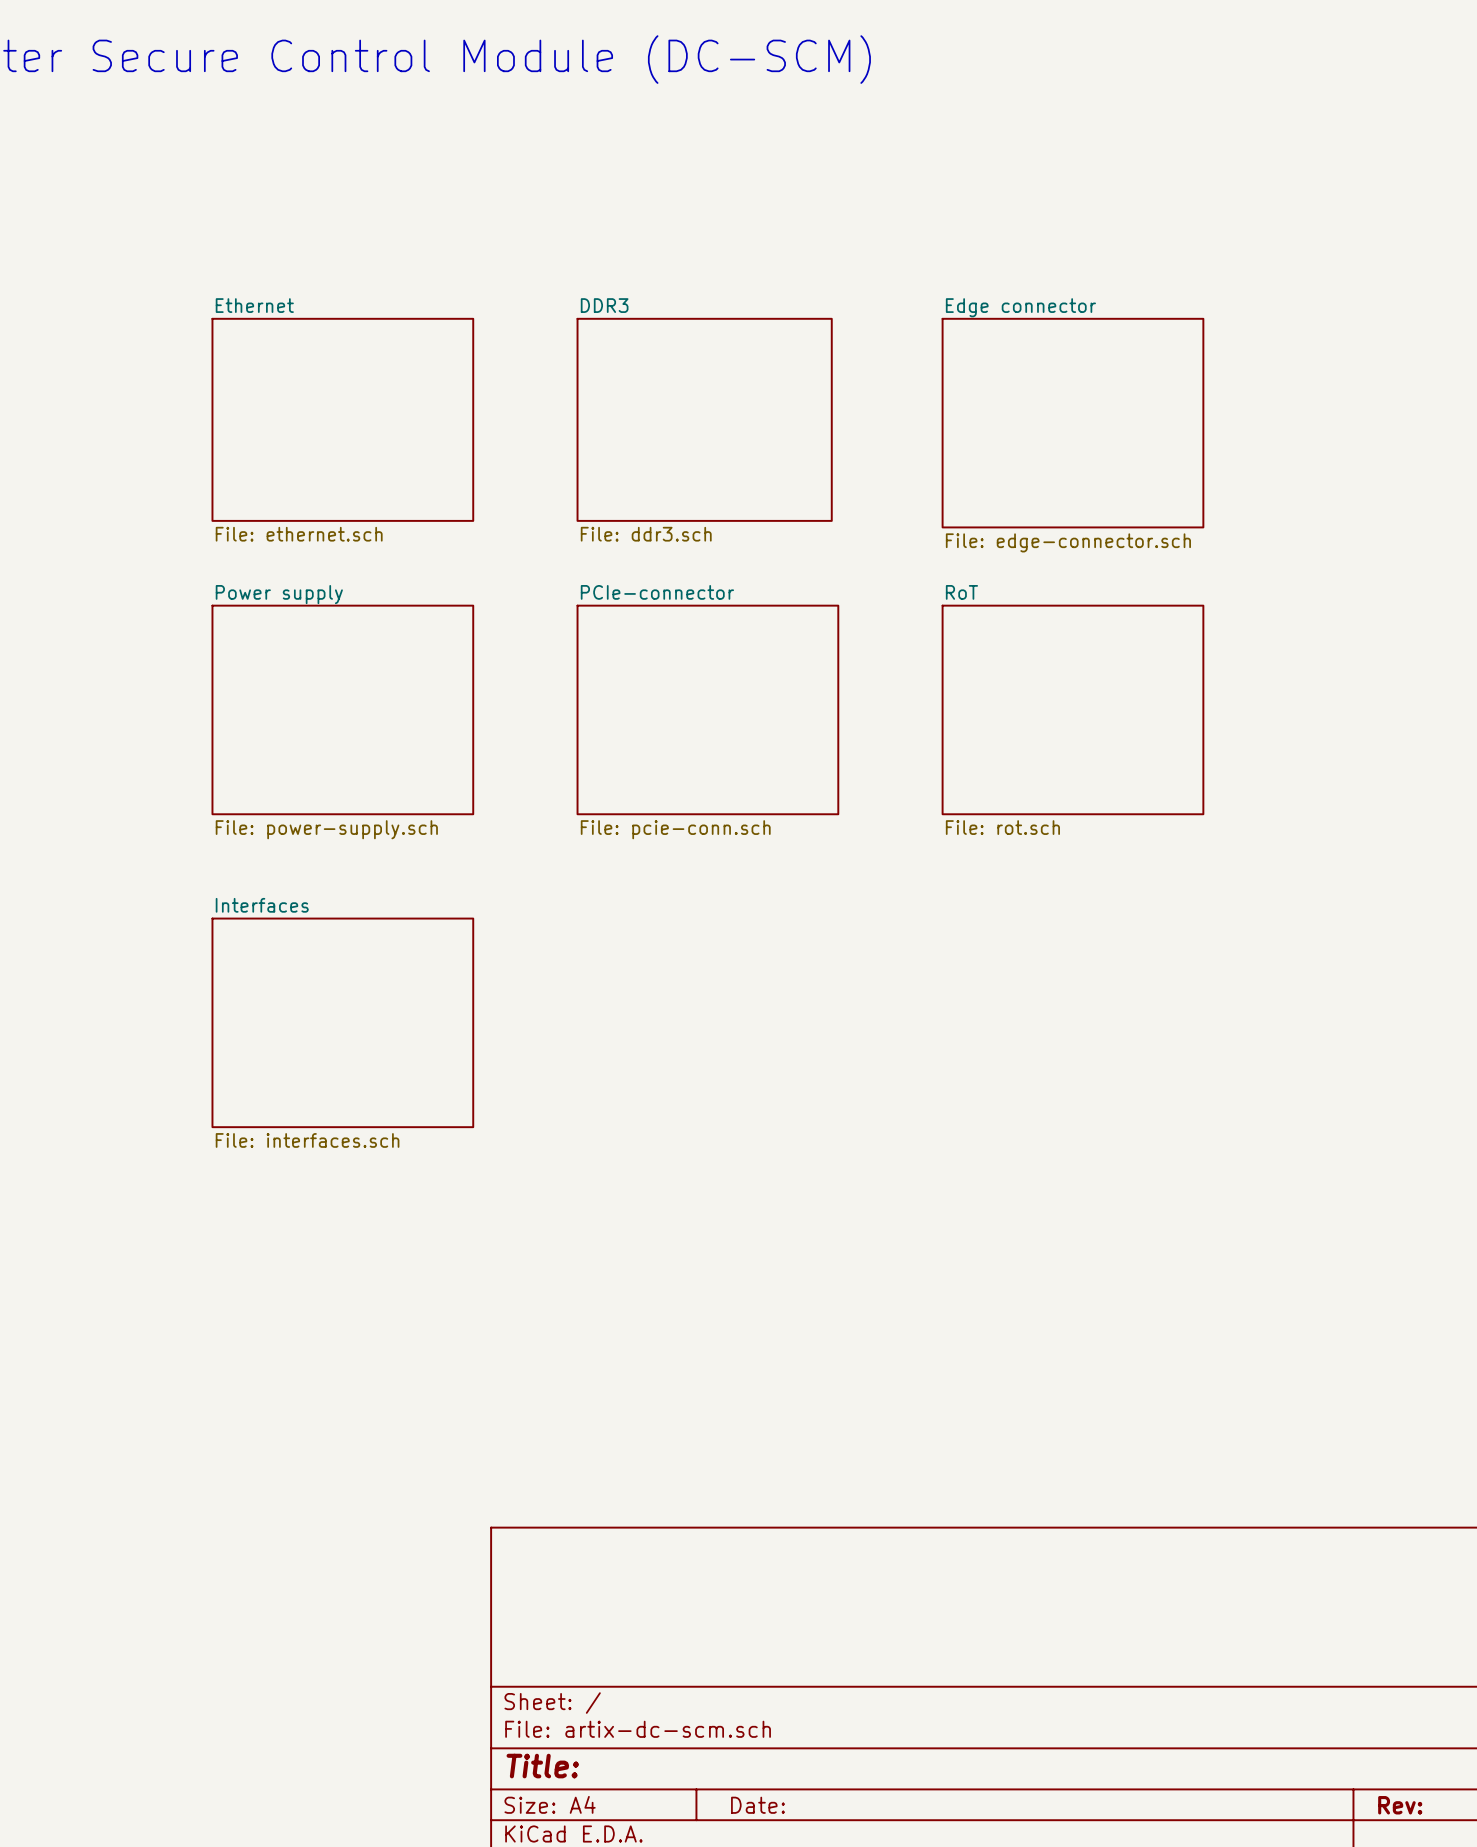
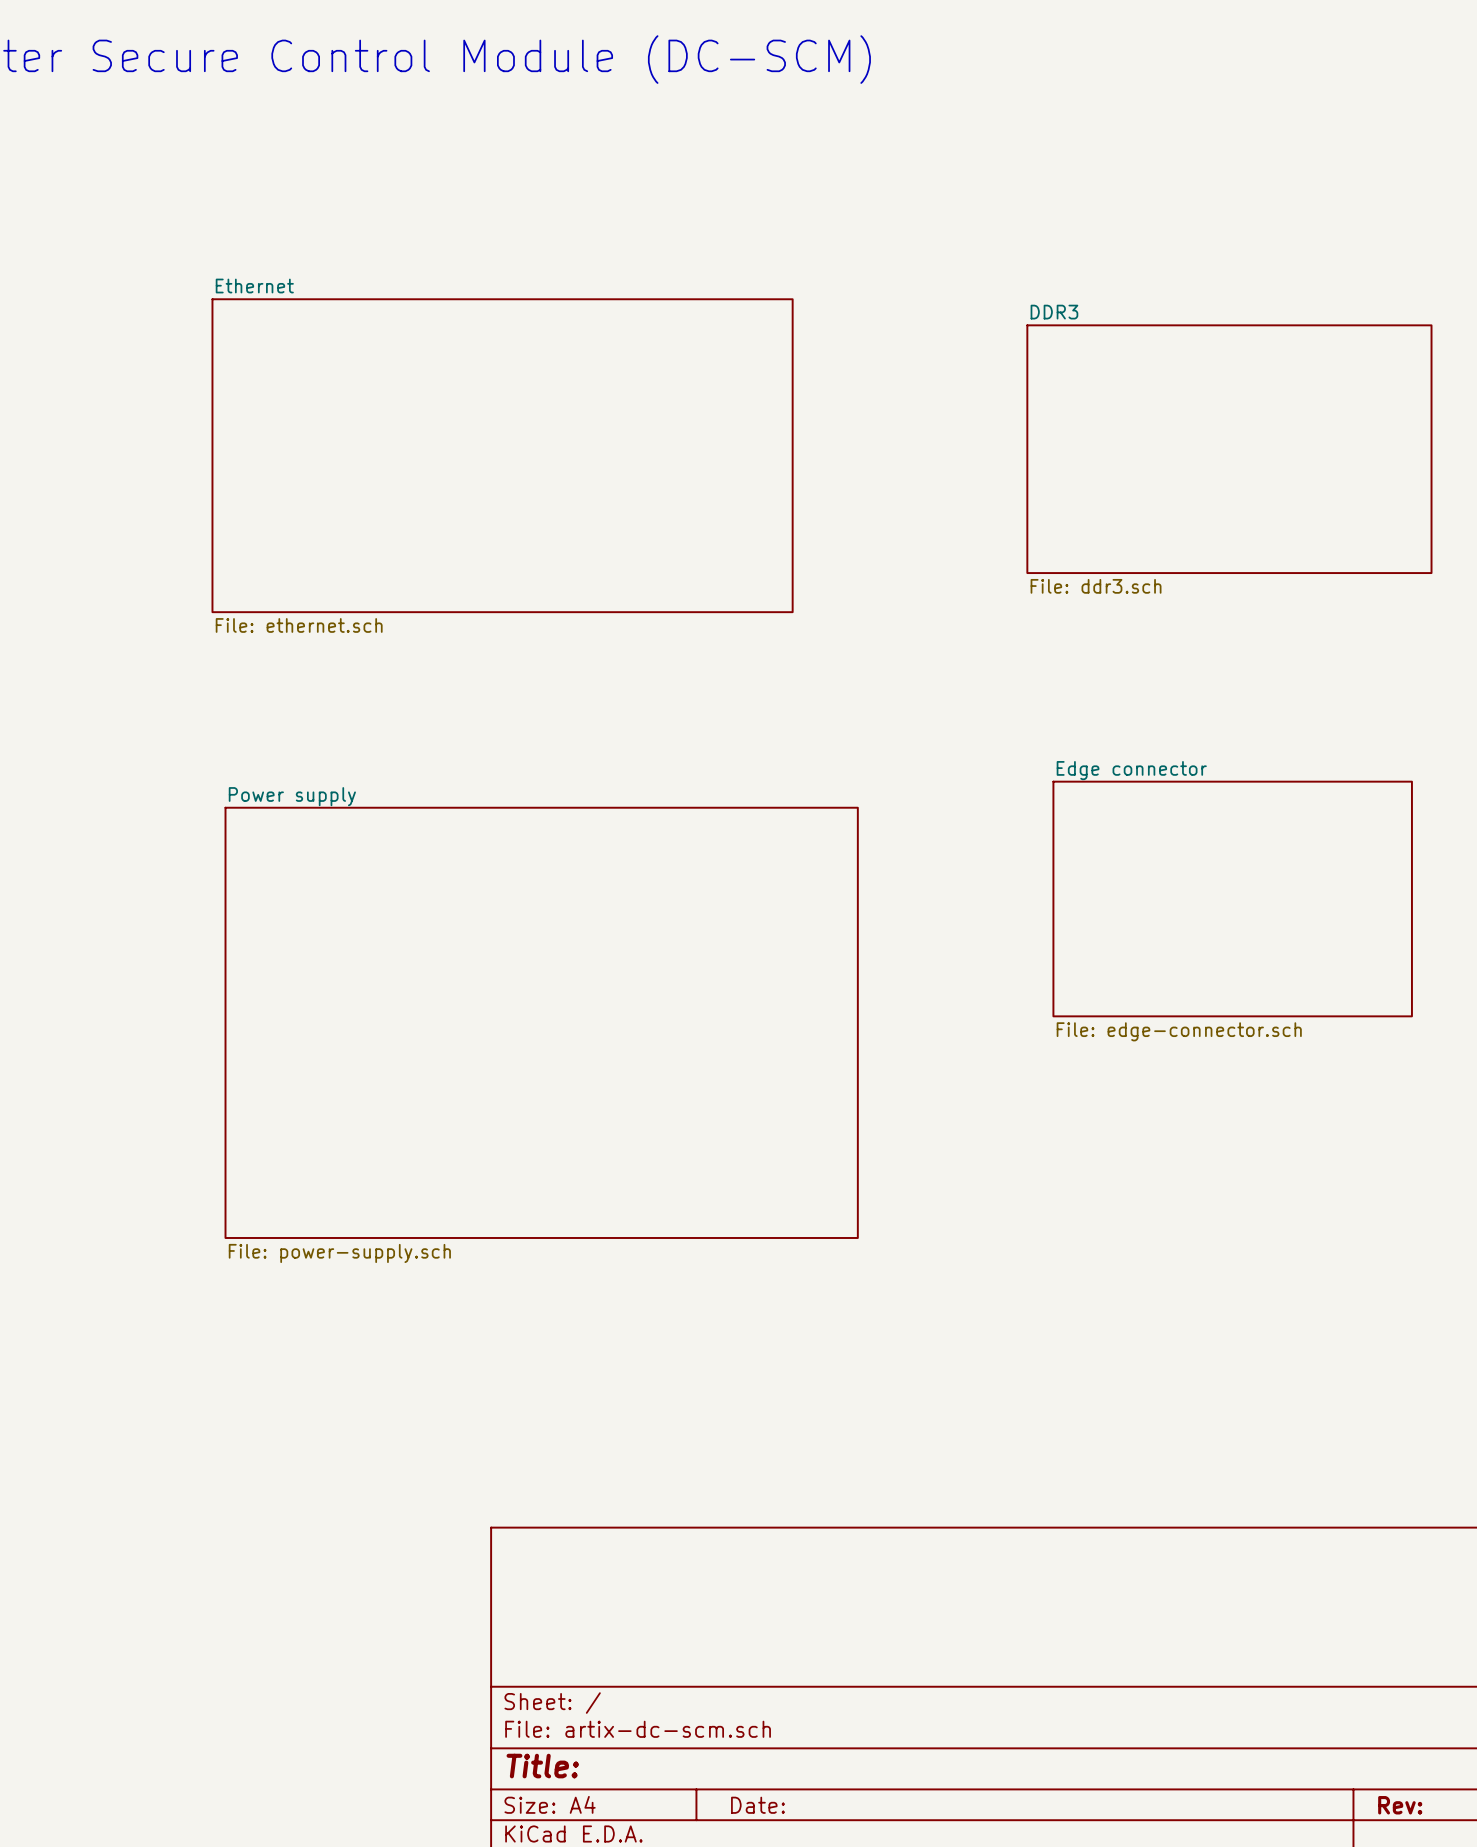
sheet DDR3 name position: DDR3 (604, 305) -> DDR3 (1054, 312)
sheet DDR3 shape: [577, 318, 832, 521] -> [1027, 325, 1432, 574]
sheet Ethernet: File: ethernet.sch (342, 419) -> none
sheet Edge connector: File: edge-connector.sch (1072, 423) -> none
sheet Ethernet: none -> File: ethernet.sch (502, 455)
sheet DDR3 value position: File: ddr3.sch (646, 534) -> File: ddr3.sch (1096, 586)
sheet Power supply: File: power-supply.sch (342, 709) -> none
sheet PCIe-connector: File: pcie-conn.sch (707, 709) -> none
sheet RoT: File: rot.sch (1072, 709) -> none
sheet Edge connector: none -> File: edge-connector.sch (1232, 899)
sheet Interfaces: File: interfaces.sch (342, 1022) -> none
sheet Power supply: none -> File: power-supply.sch (541, 1022)

